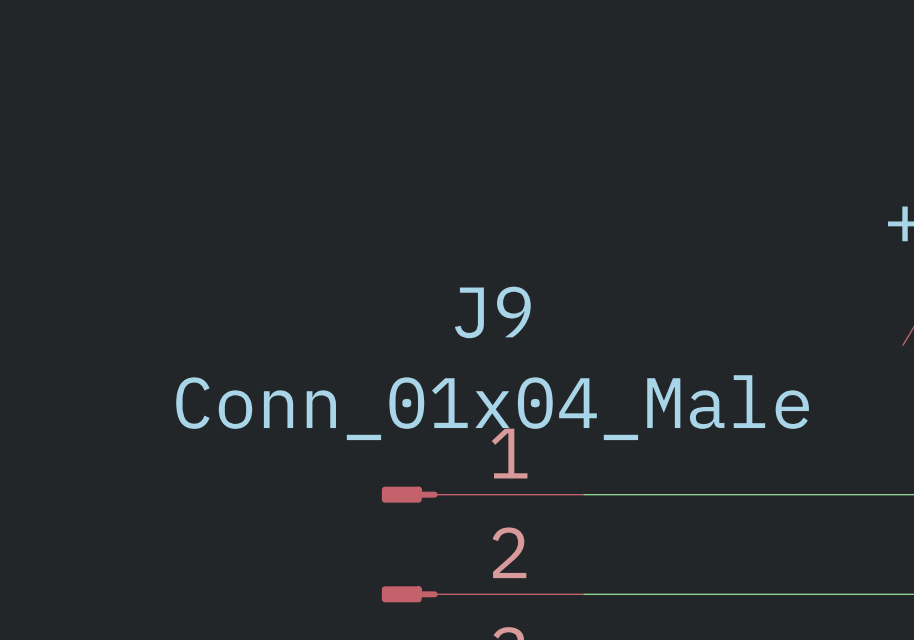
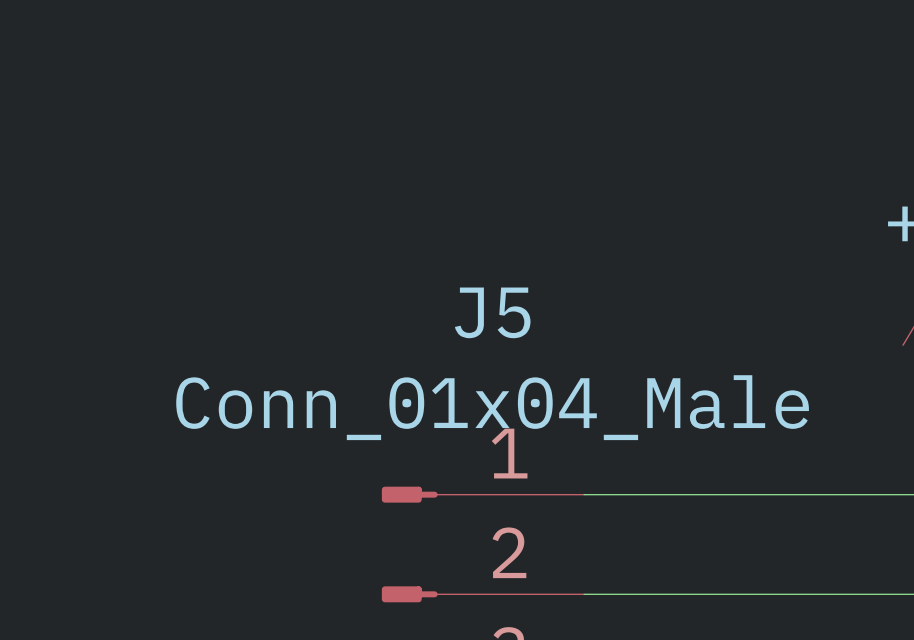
J9 name: J9 (492, 312) -> J5 (492, 312)

